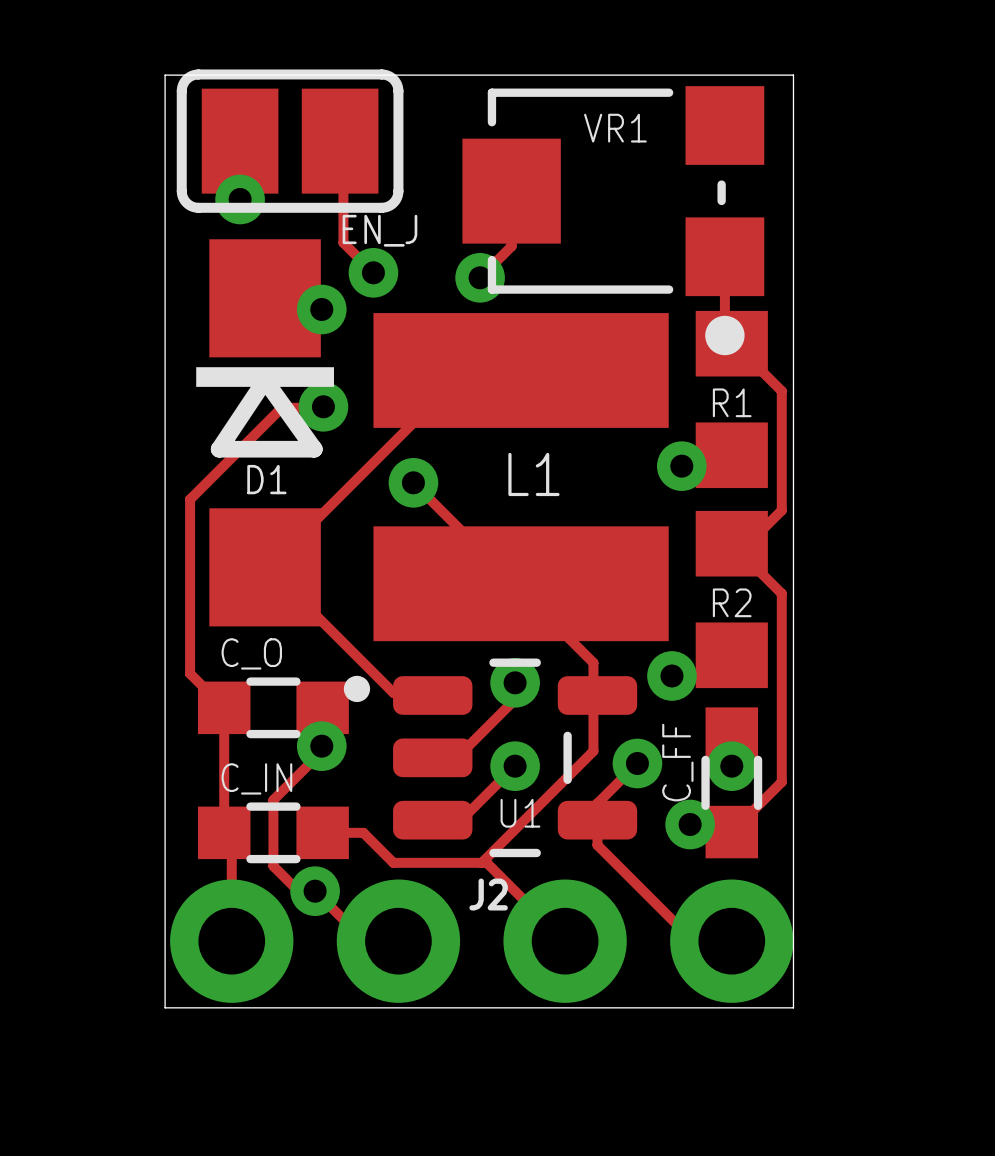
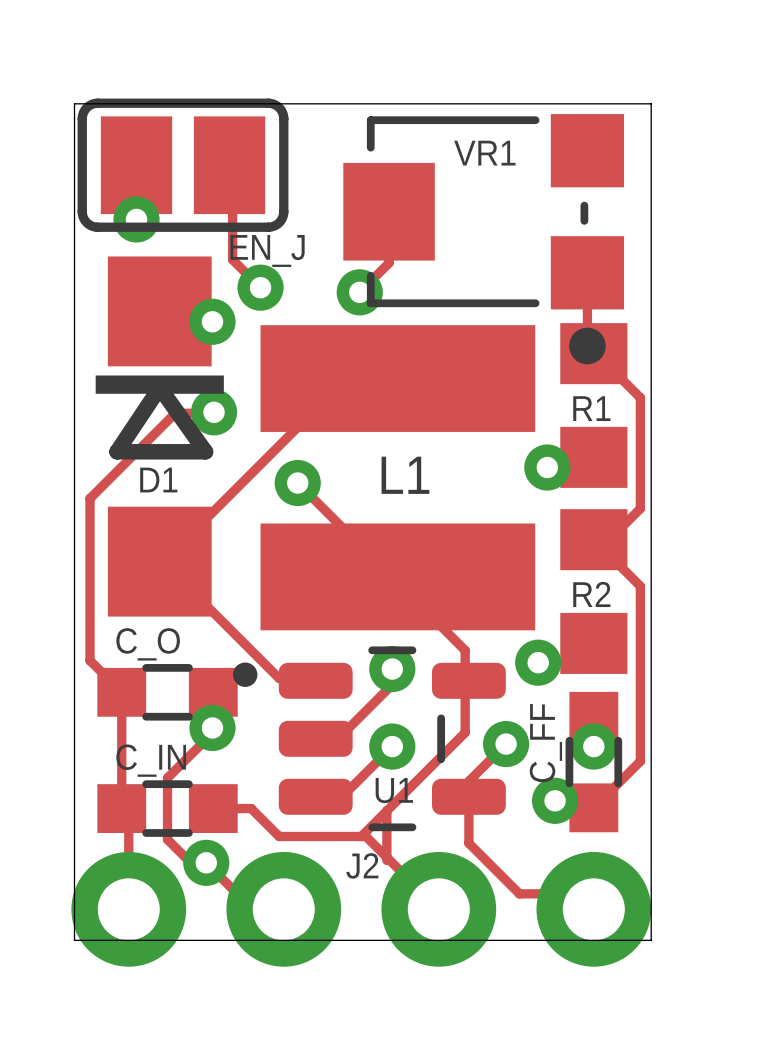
board edge: (173, 75) (165, 75) (165, 1007) (793, 1007) (793, 974) -> (74, 103) (74, 940) (651, 940)
track: none -> (386, 810) (386, 860)
track: (597, 845) (693, 941) (731, 941) -> (468, 820) (468, 843) (519, 893) (593, 893)

